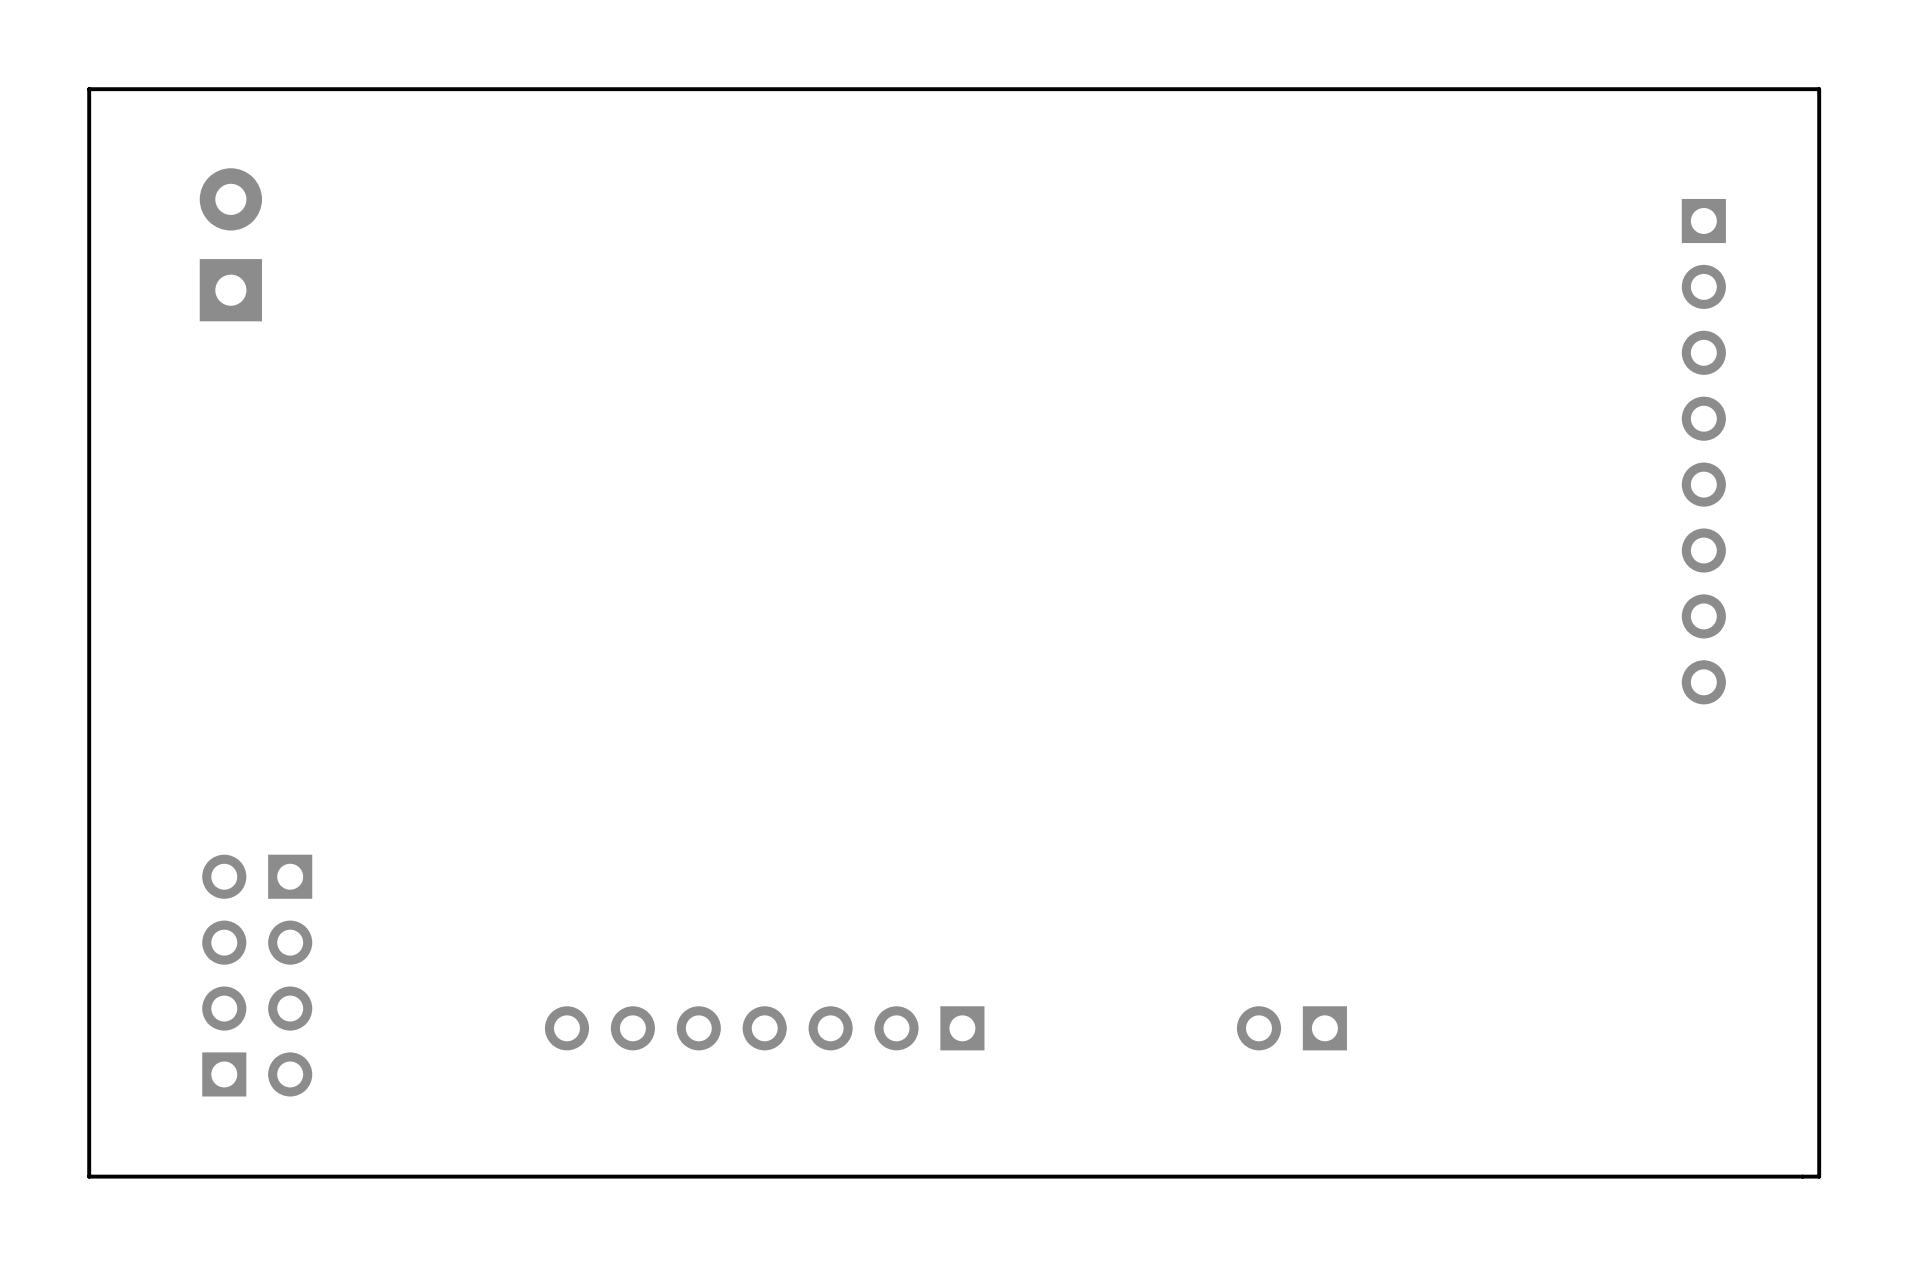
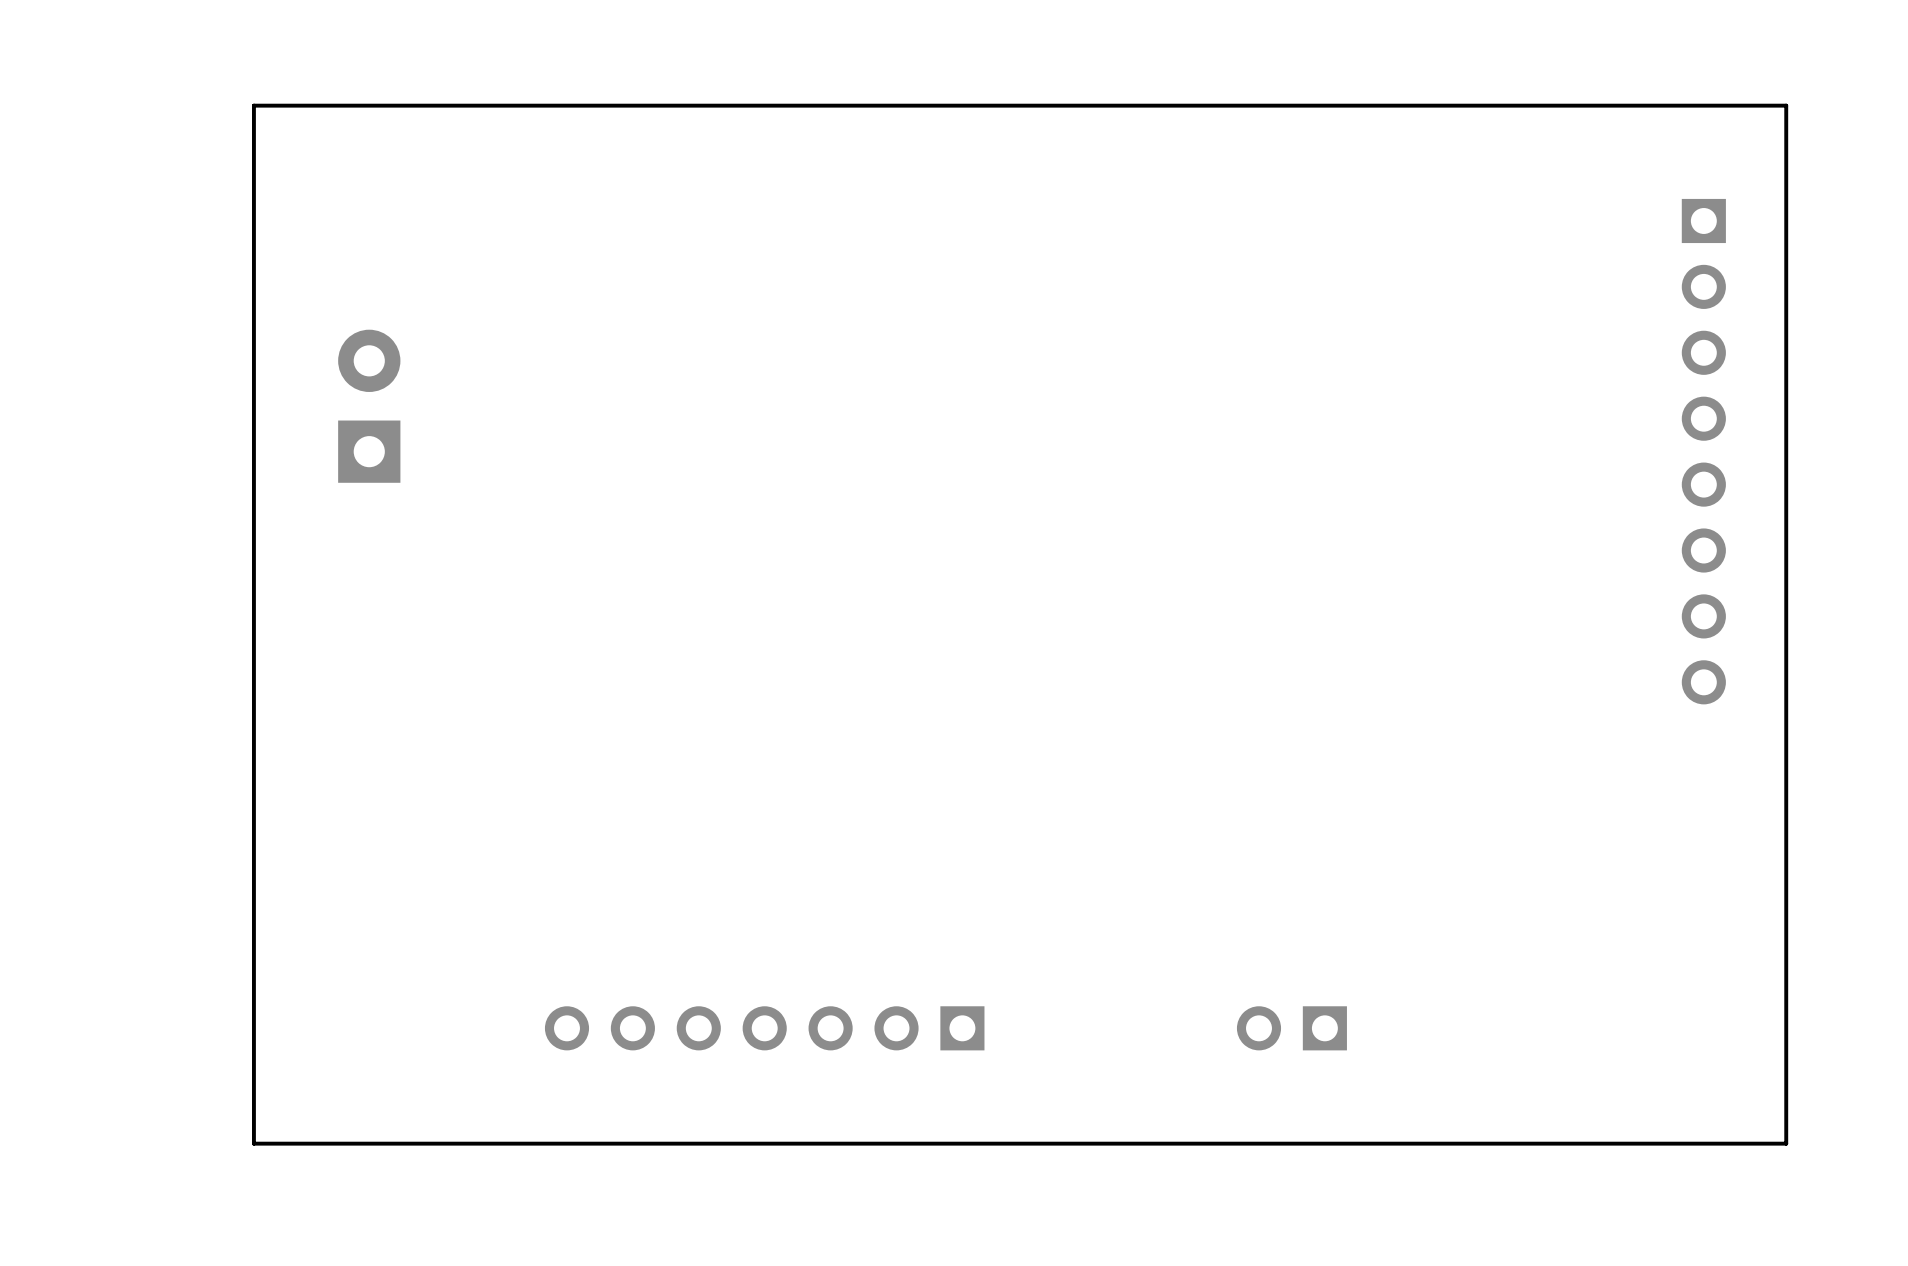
board edge: (1819, 89) (1819, 1176) (89, 1176) (89, 89) (1819, 89) -> (1786, 105) (1786, 1143) (253, 1143) (253, 105) (1786, 105)
part position: (230, 244) -> (369, 406)
part: (224, 975) -> none
part: (290, 975) -> none

